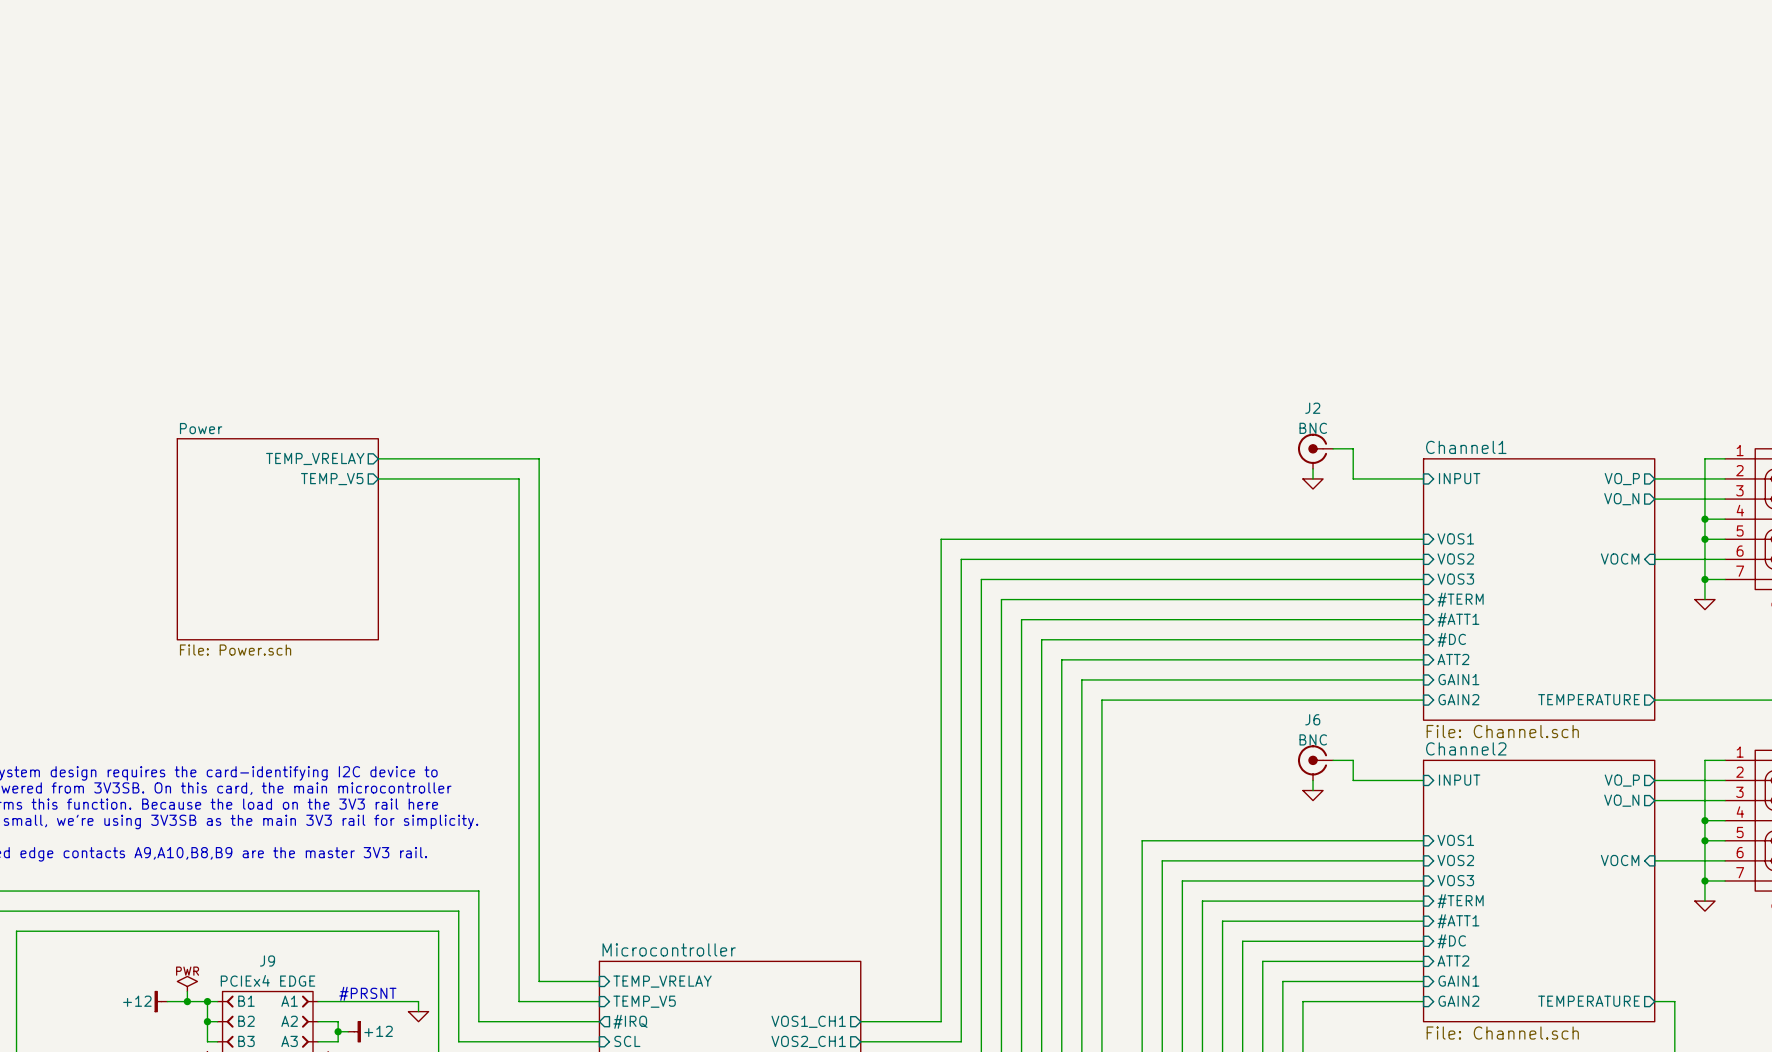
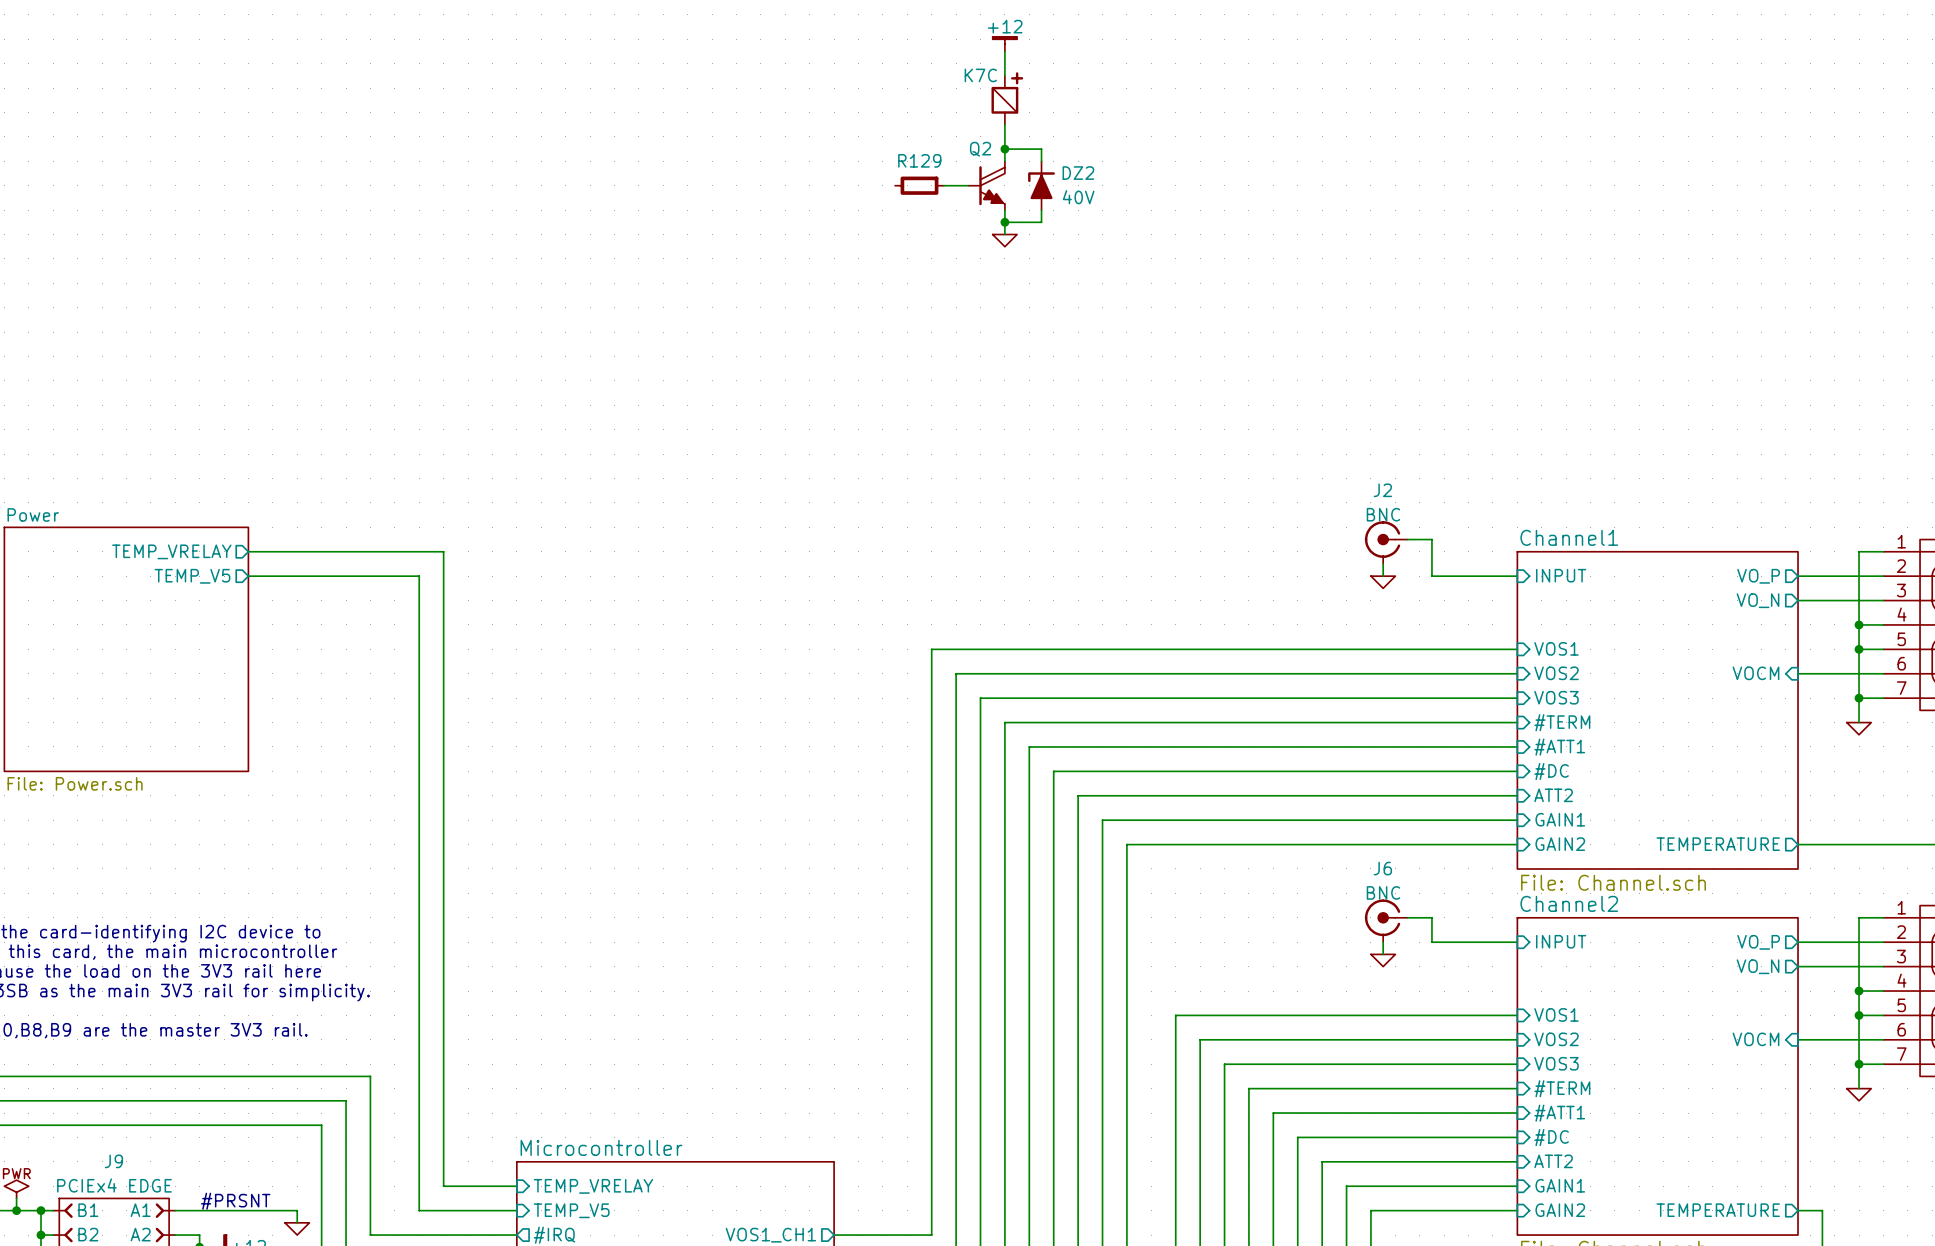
power symbol: none -> +12 (1004, 44)
wire: none -> (1004, 51) (1004, 75)
K7C: none -> (1007, 98)
wire: none -> (1004, 124) (1004, 161)
wire: none -> (1004, 149) (1041, 149) (1041, 161)
junction: none -> (1004, 149)
R129: none -> (919, 185)
wire: none -> (943, 185) (968, 185)
Q2: none -> (986, 185)
DZ2: none -> 40V (1041, 185)
wire: none -> (1004, 210) (1004, 234)
wire: none -> (1041, 210) (1041, 222) (1004, 222)
junction: none -> (1004, 222)
power symbol: none -> (1004, 240)

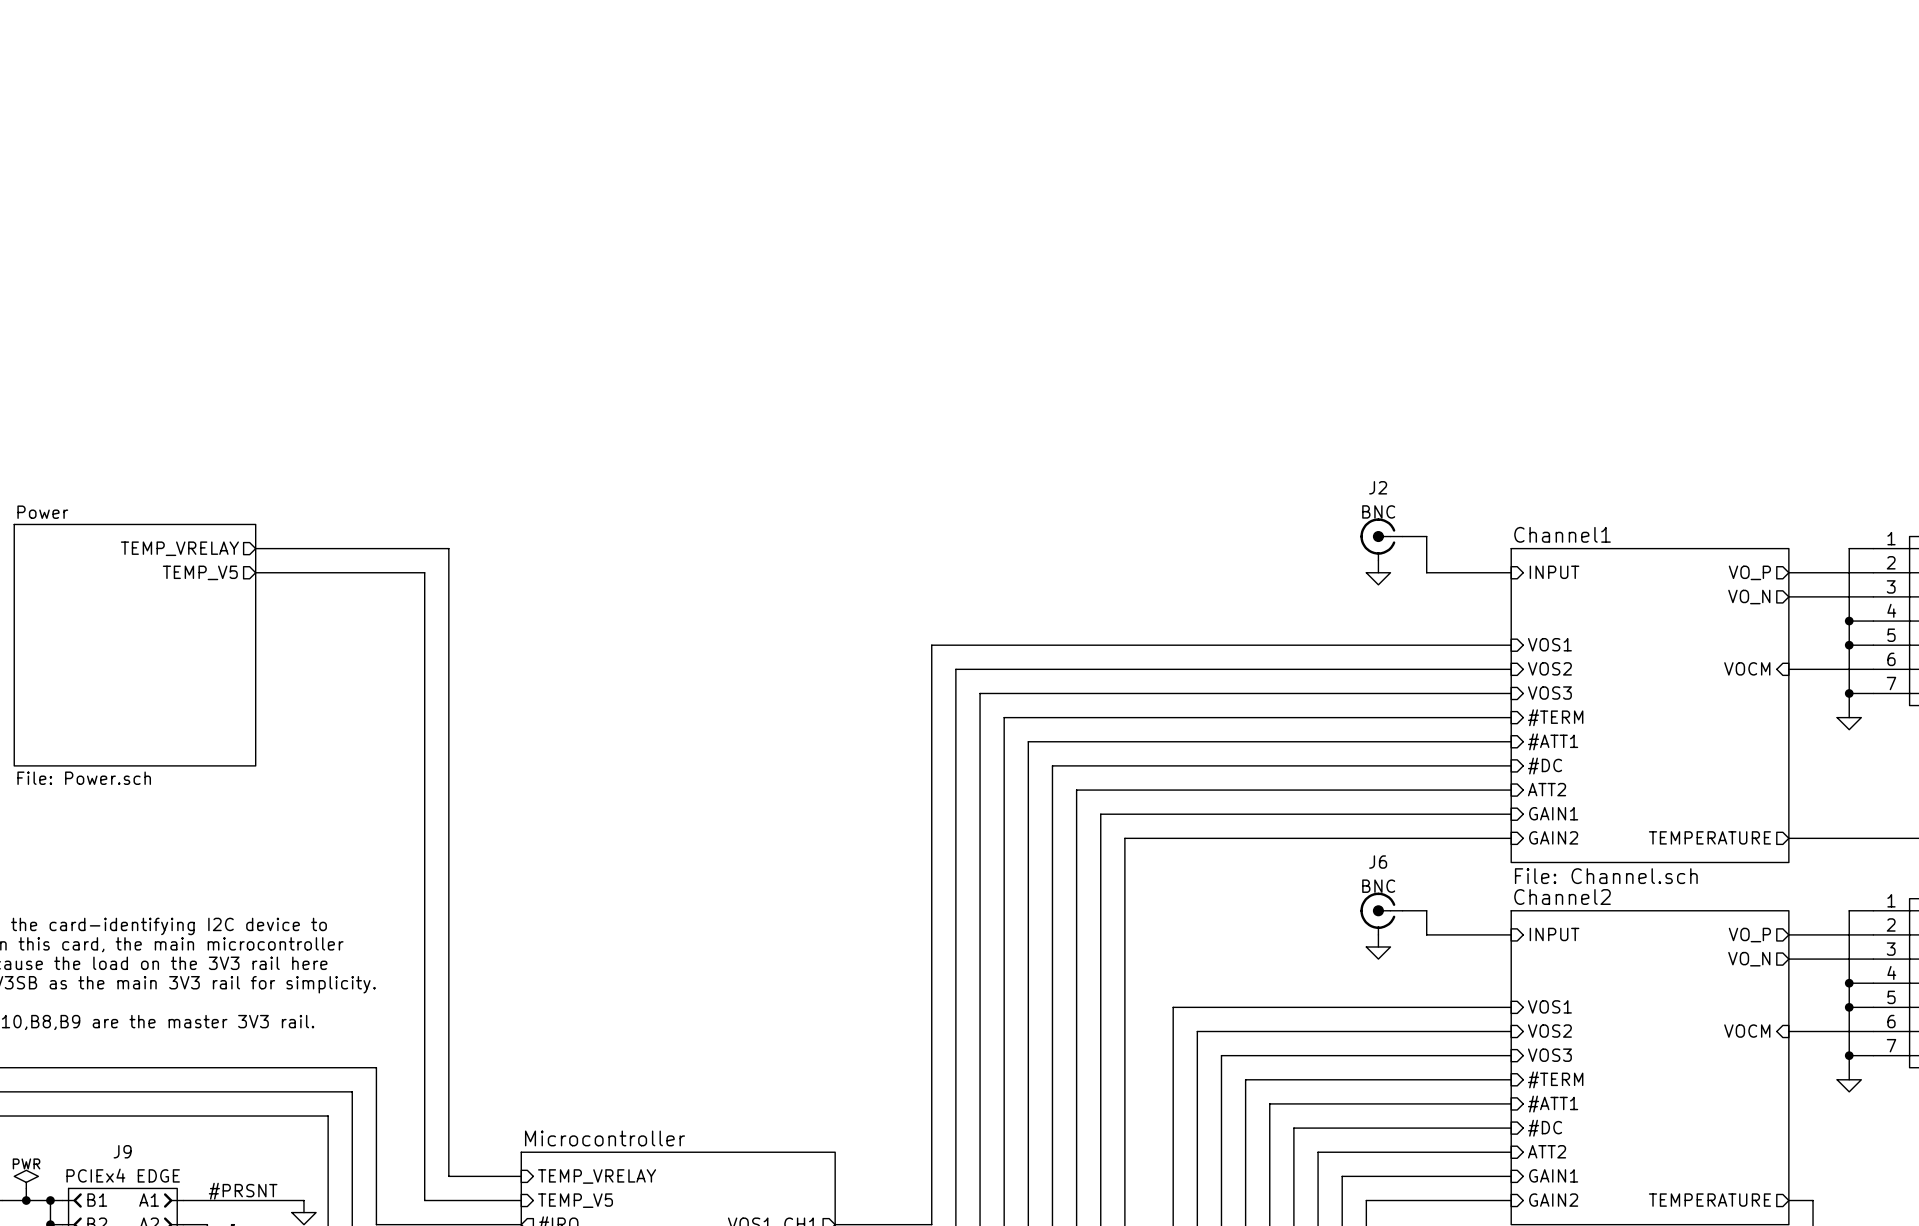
power symbol: +12 (1004, 44) -> none
wire: (1004, 51) (1004, 75) -> none
K7C: (1007, 98) -> none
wire: (1004, 124) (1004, 161) -> none
wire: (1004, 149) (1041, 149) (1041, 161) -> none
junction: (1004, 149) -> none
R129: (919, 185) -> none
wire: (943, 185) (968, 185) -> none
Q2: (986, 185) -> none
DZ2: 40V (1041, 185) -> none
wire: (1004, 210) (1004, 234) -> none
wire: (1041, 210) (1041, 222) (1004, 222) -> none
junction: (1004, 222) -> none
power symbol: (1004, 240) -> none

